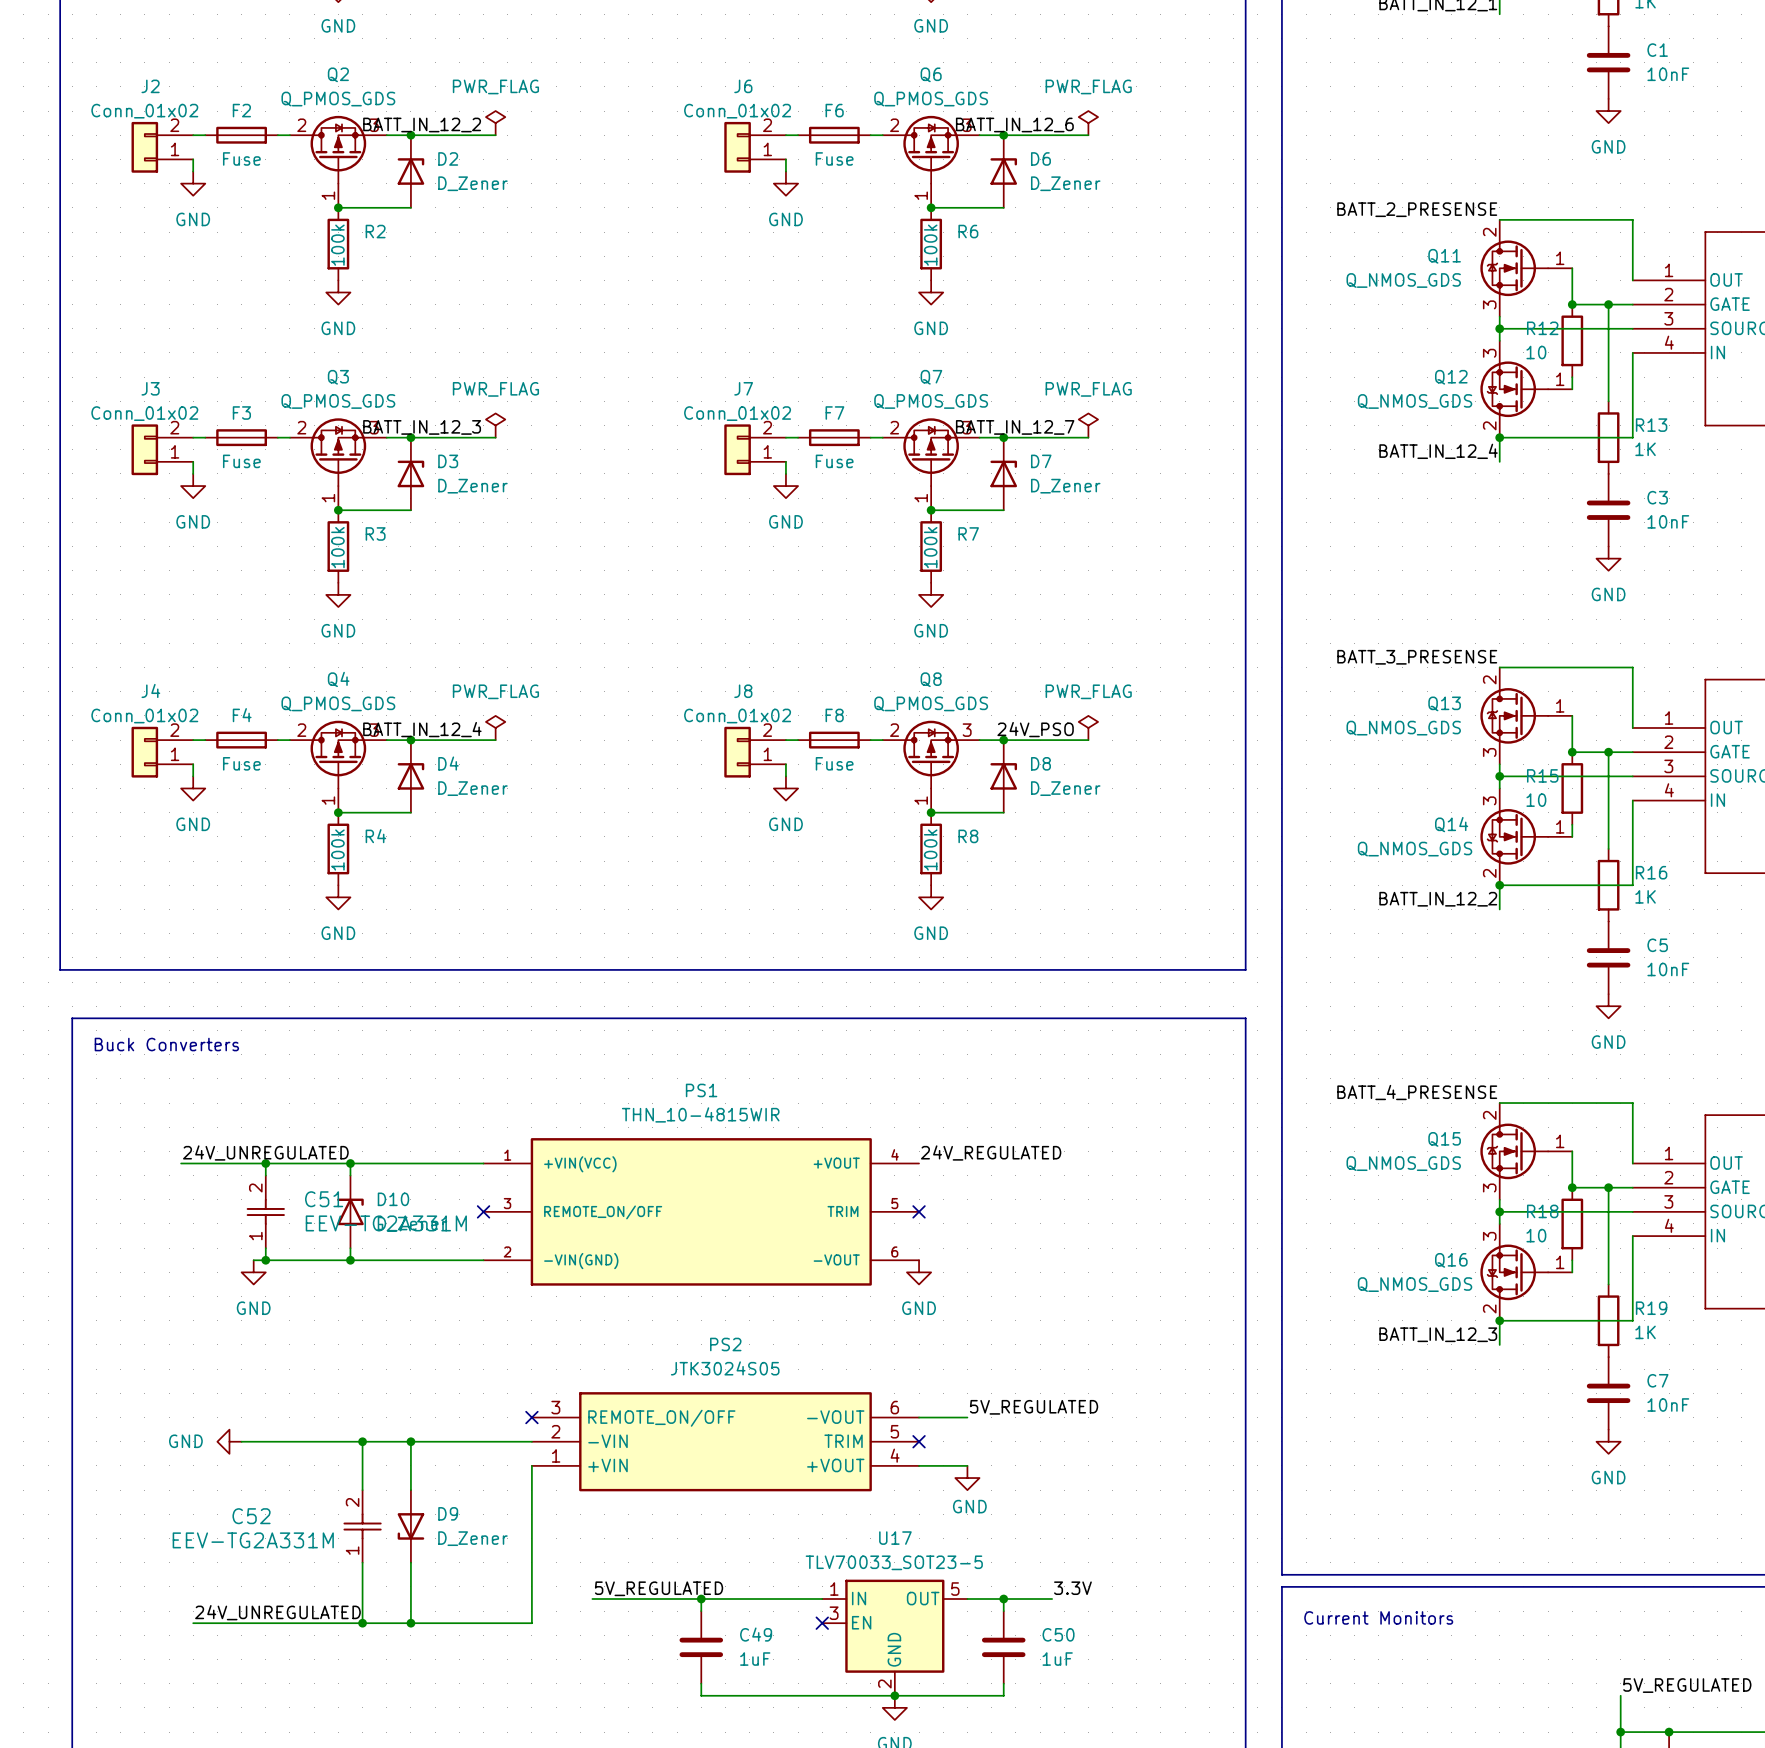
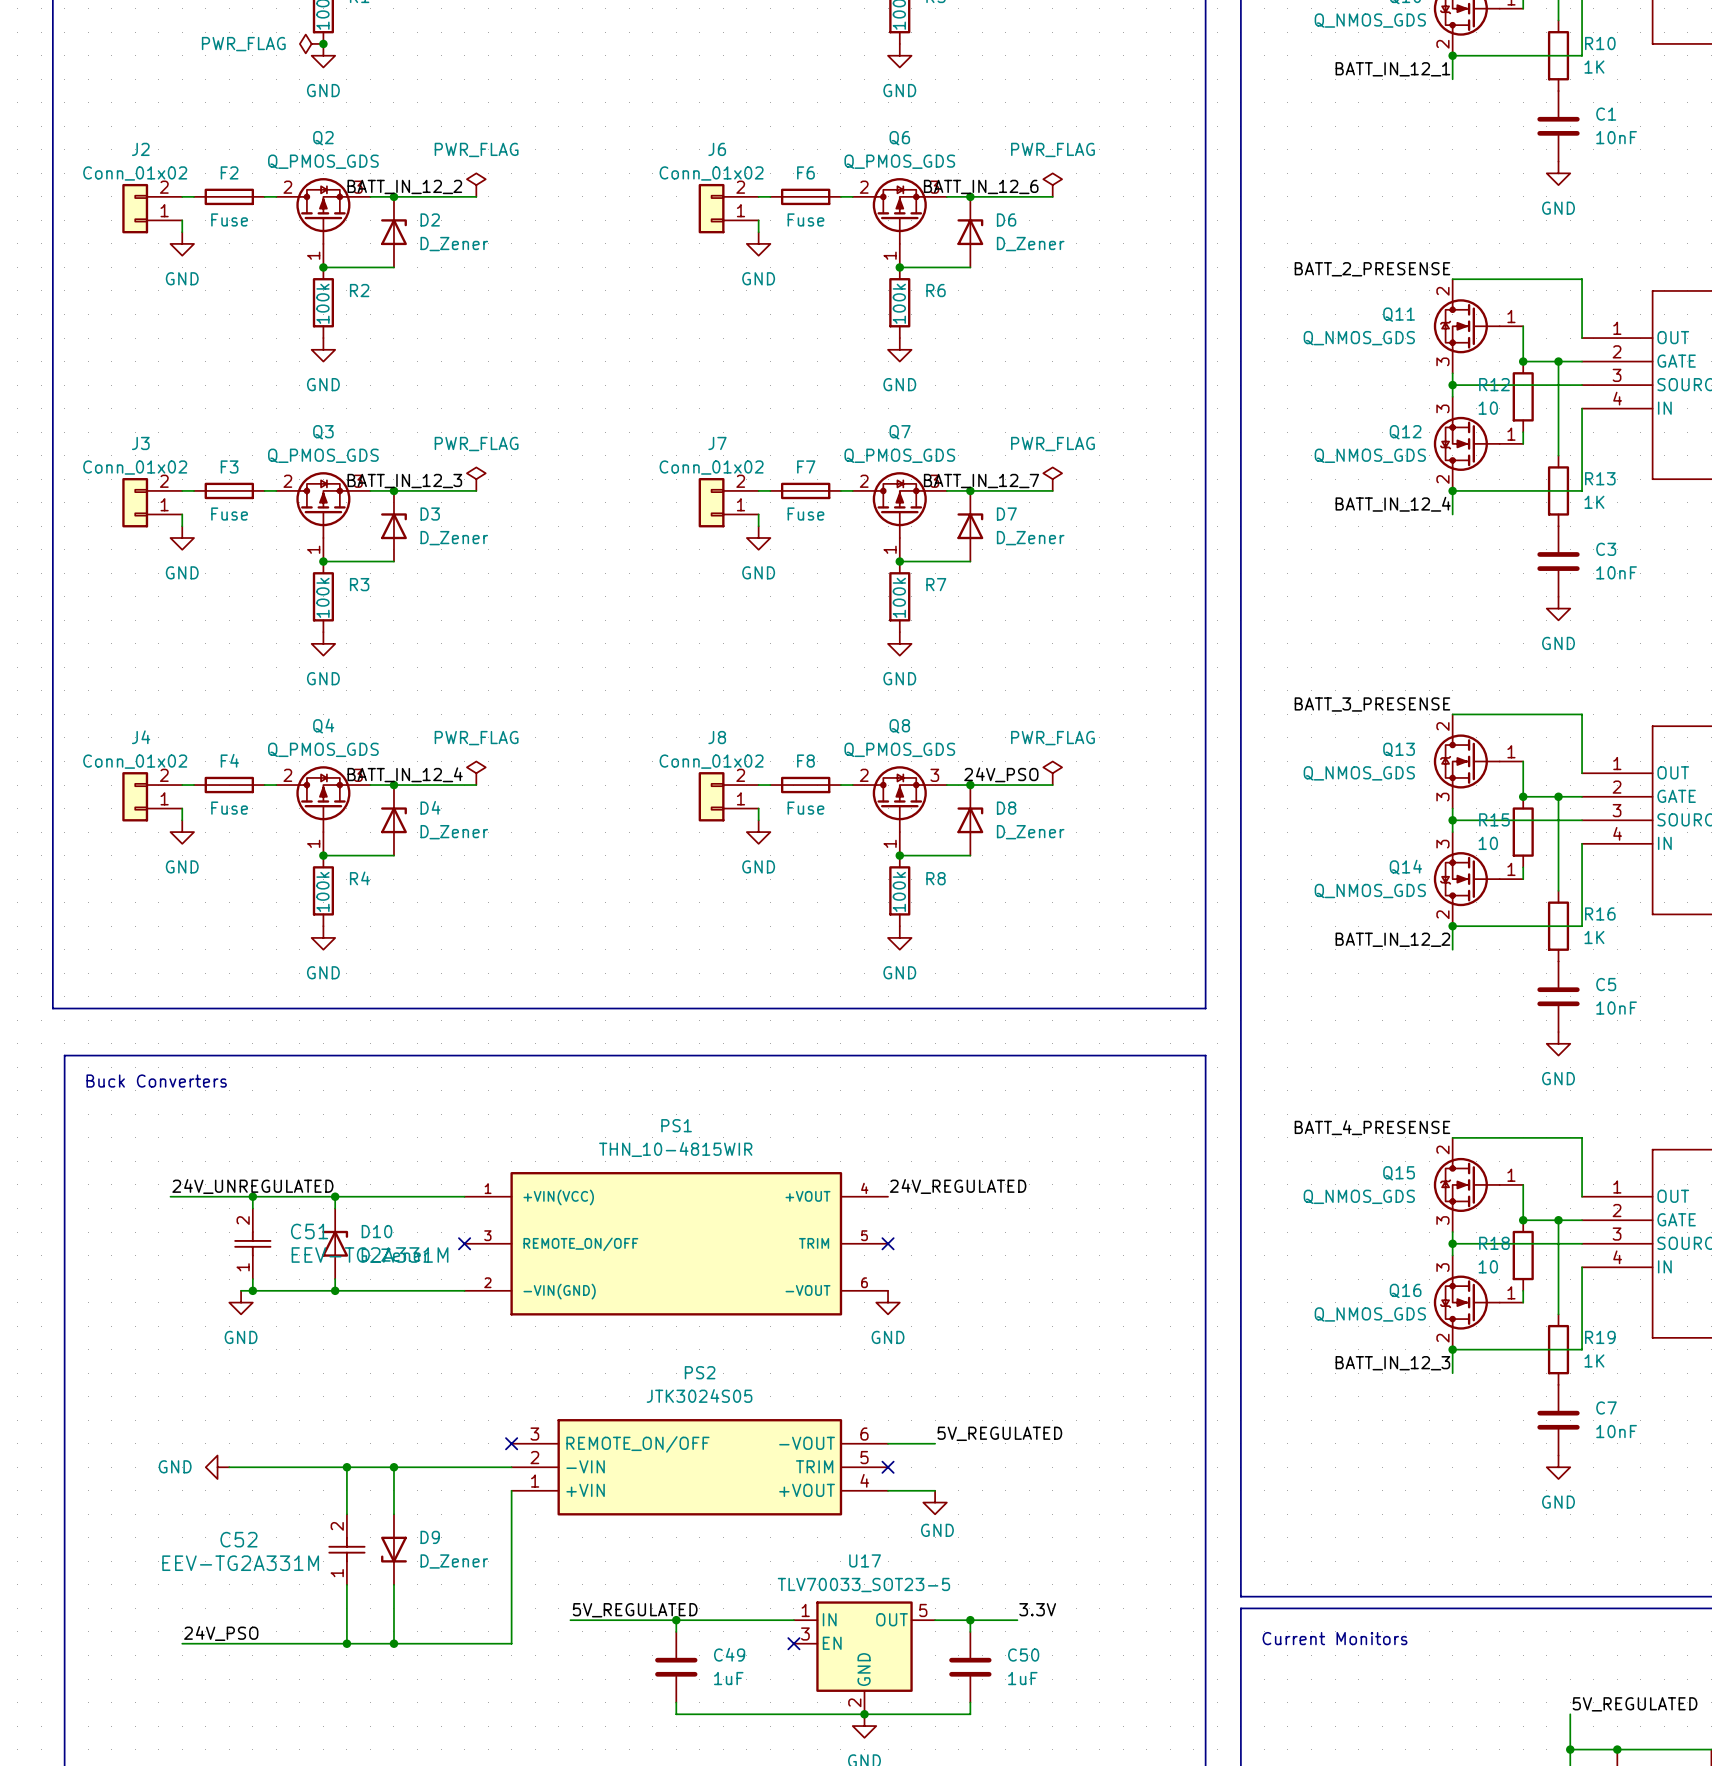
label: 24V_UNREGULATED (277, 1612) -> 24V_PSO (221, 1633)

